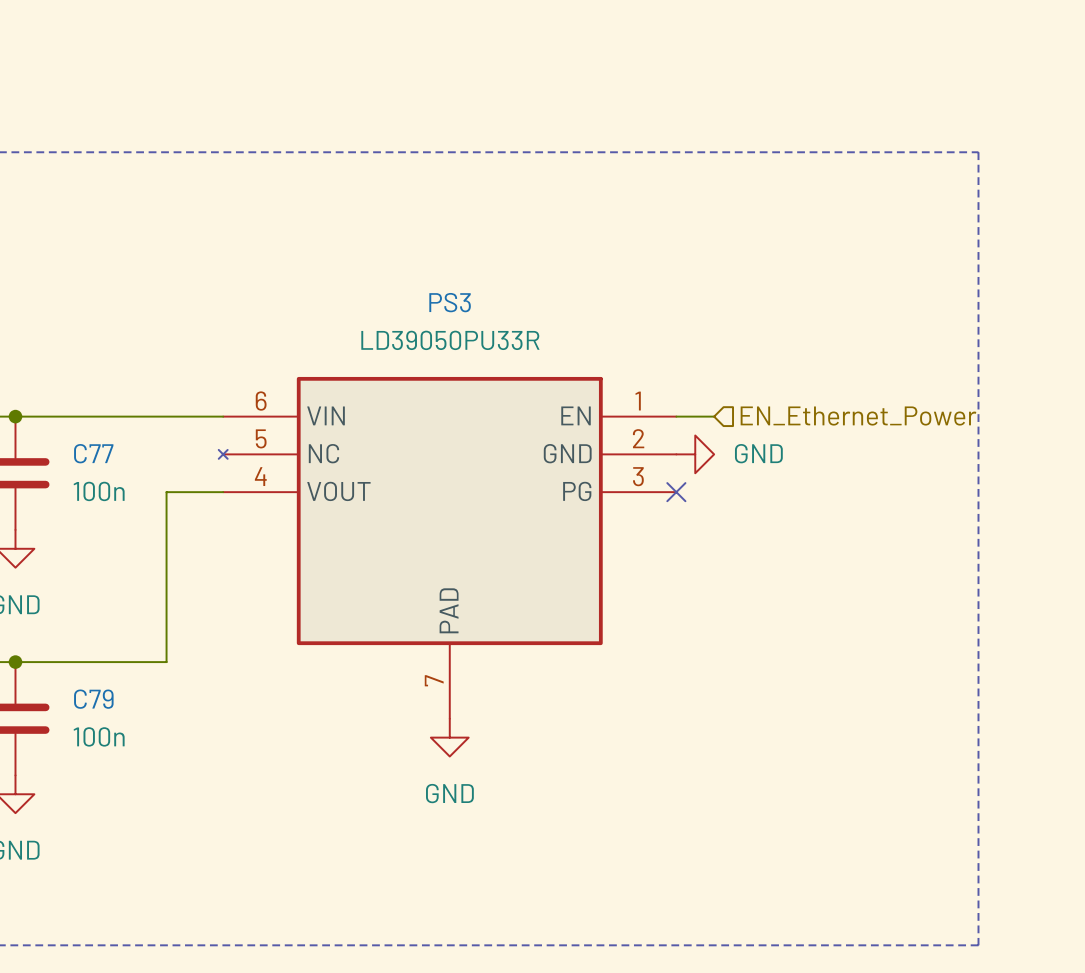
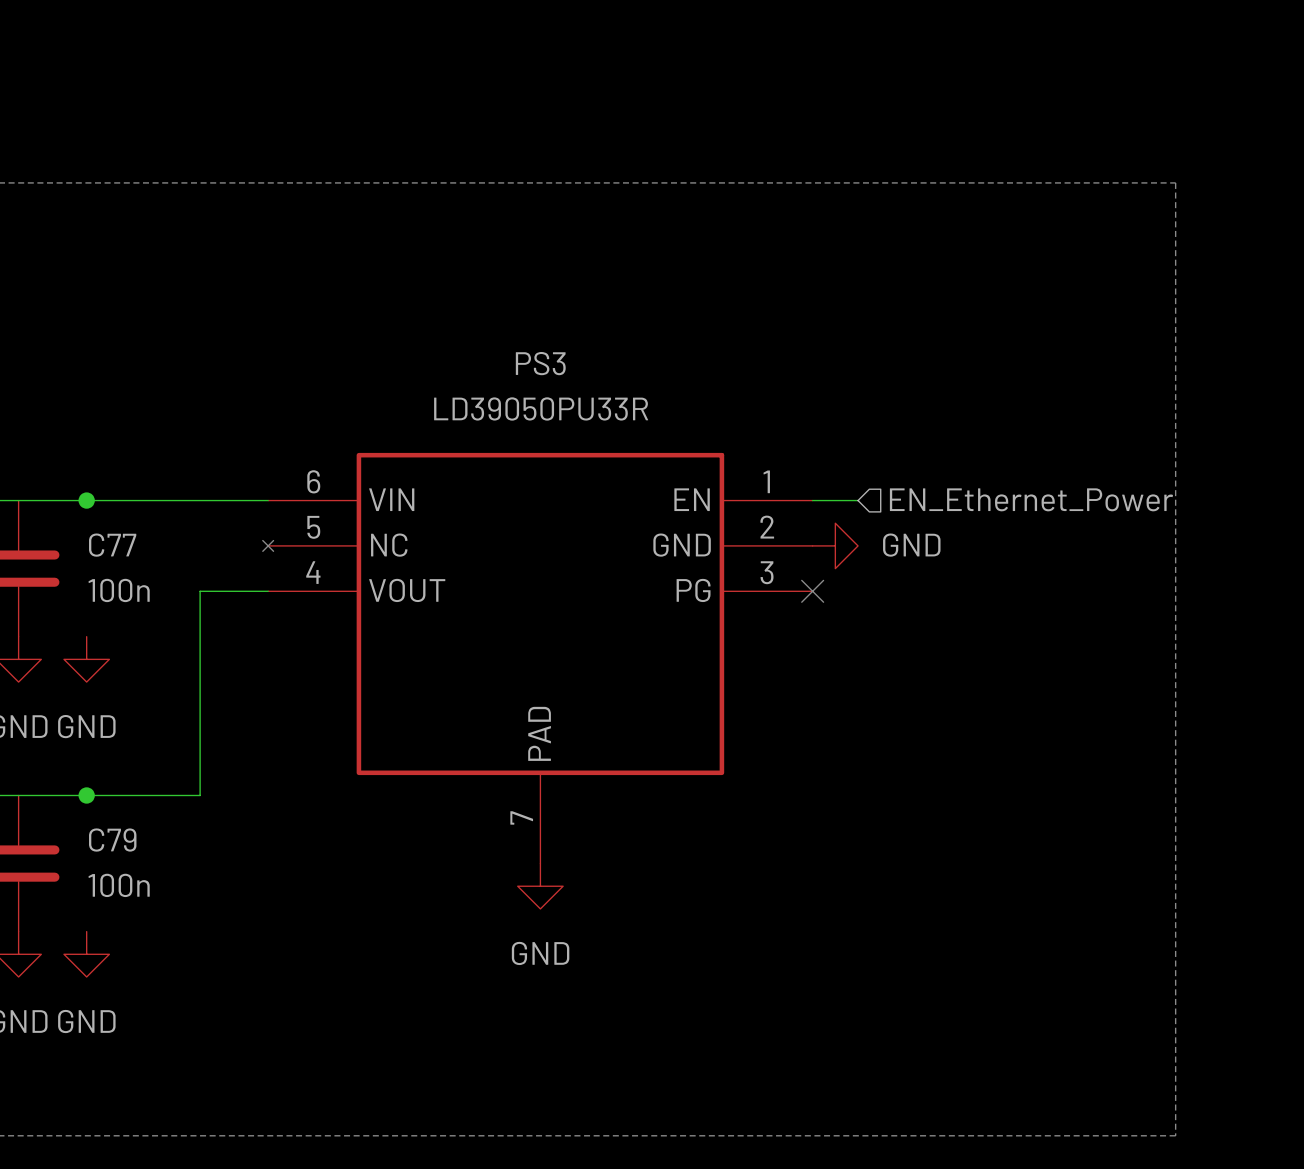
junction: (15, 416) -> none
junction: none -> (86, 500)
power symbol: none -> GND (86, 659)
junction: (15, 662) -> none
junction: none -> (86, 795)
power symbol: none -> GND (86, 954)

